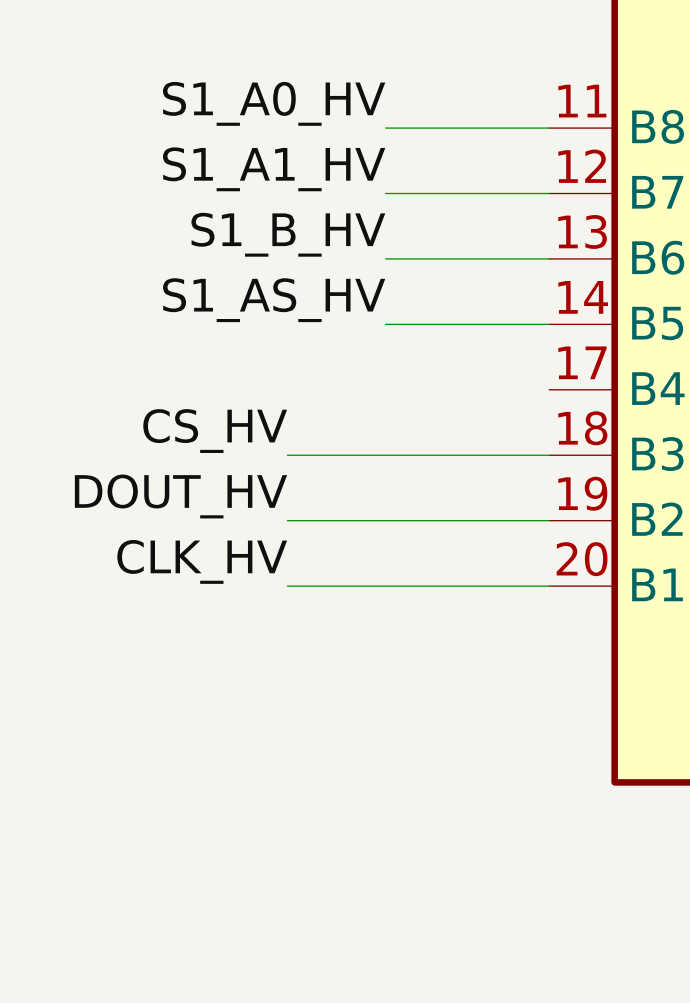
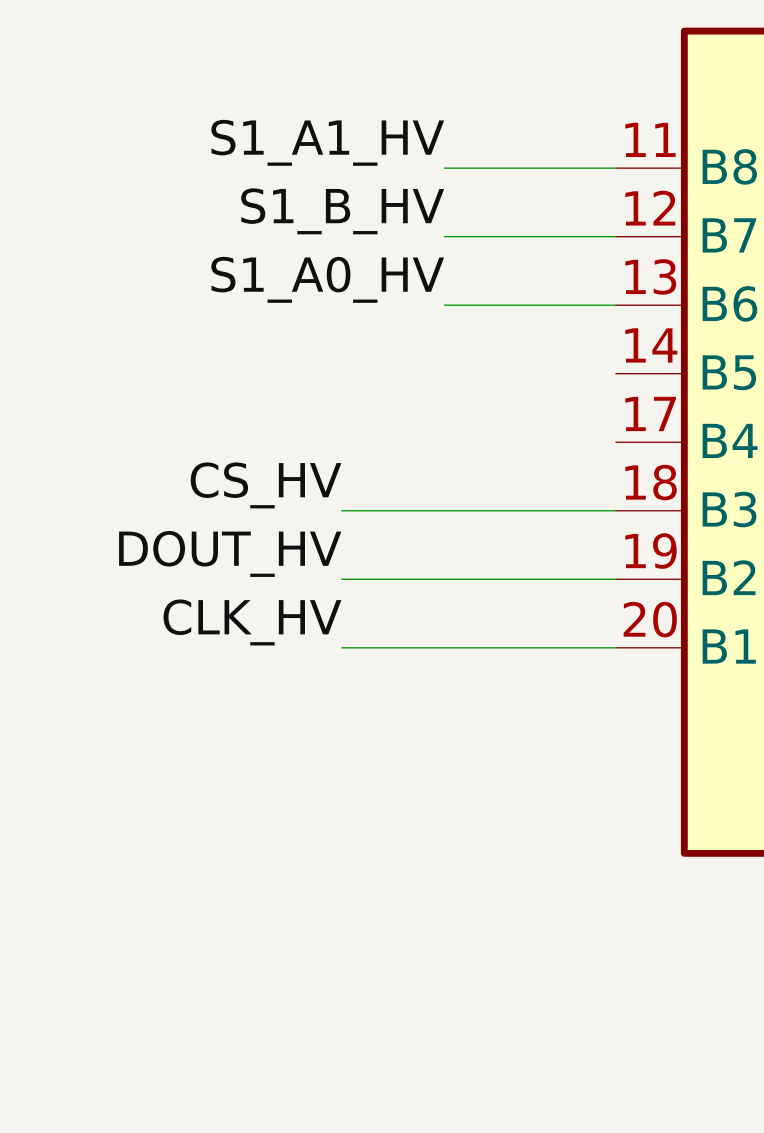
label: S1_A0_HV (274, 103) -> S1_A1_HV (327, 142)
label: S1_A1_HV (274, 169) -> S1_B_HV (342, 211)
label: S1_B_HV (288, 234) -> S1_A0_HV (327, 279)
label: S1_AS_HV (274, 300) -> none
wire: (385, 324) (549, 324) -> none

